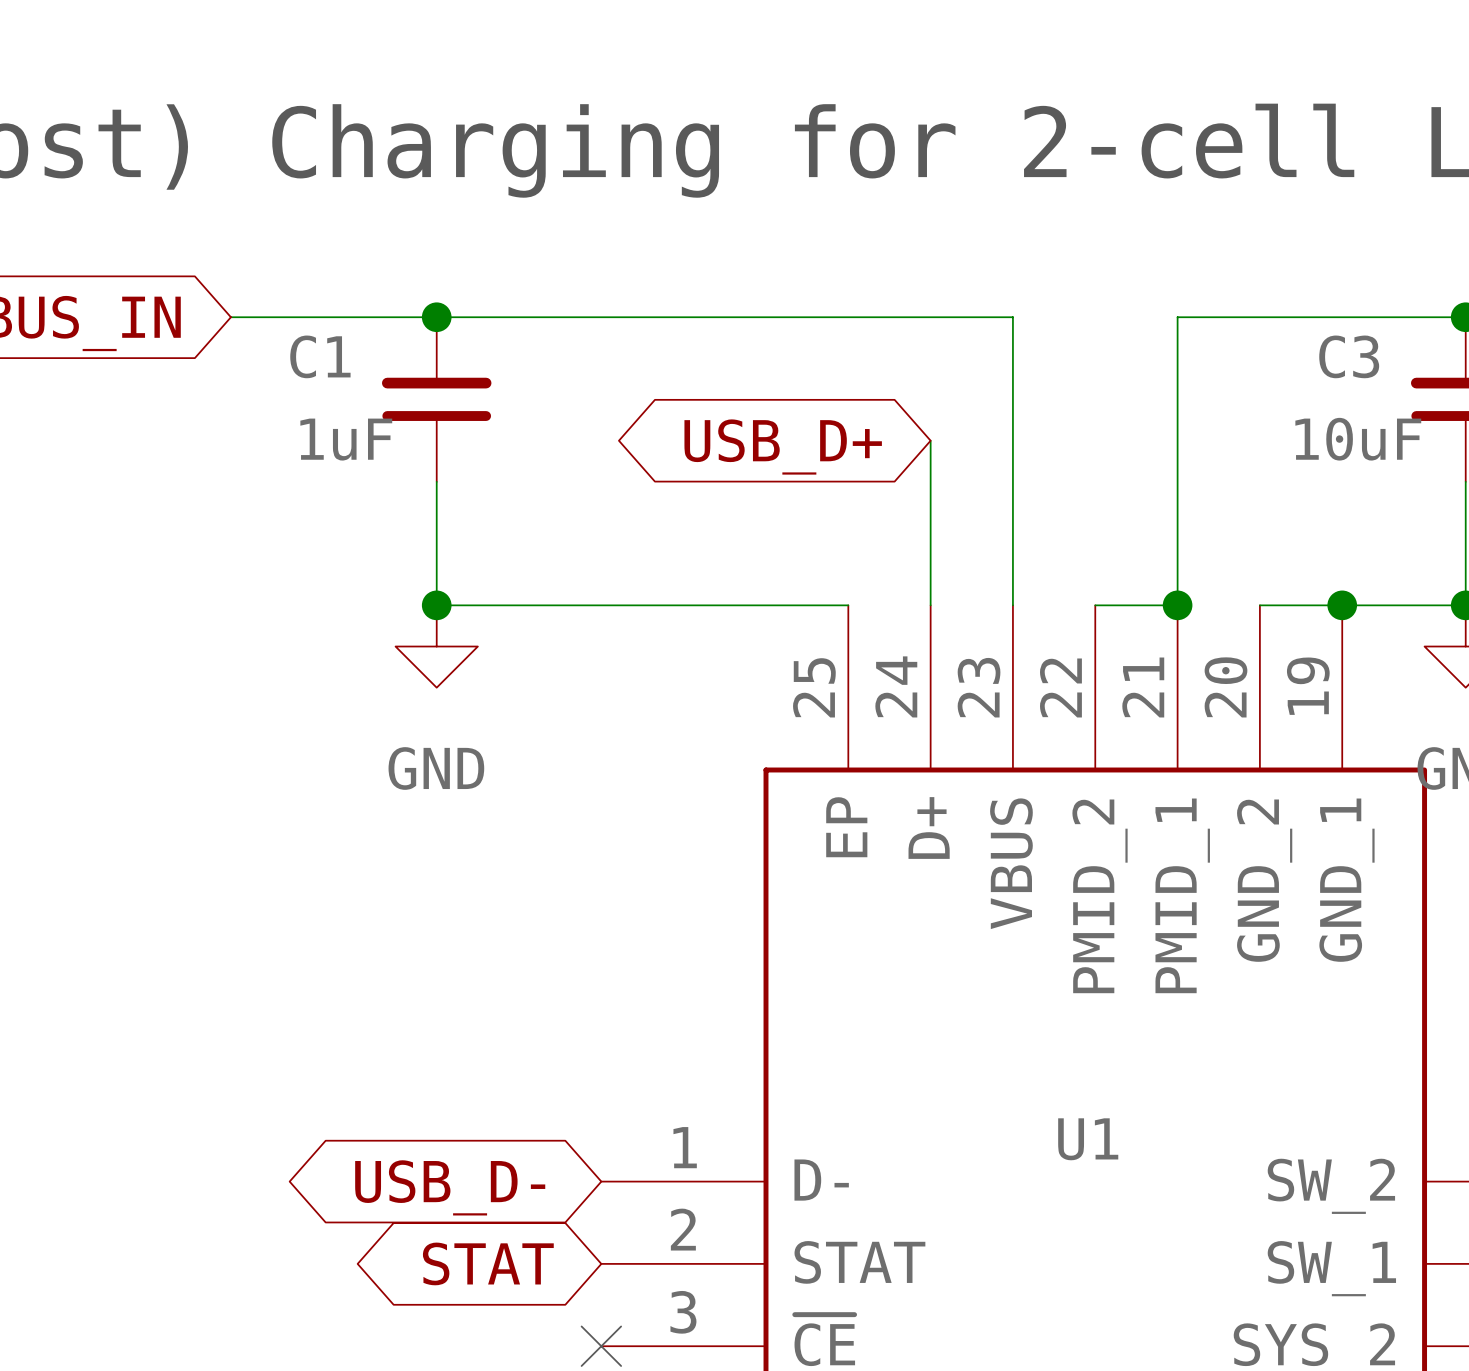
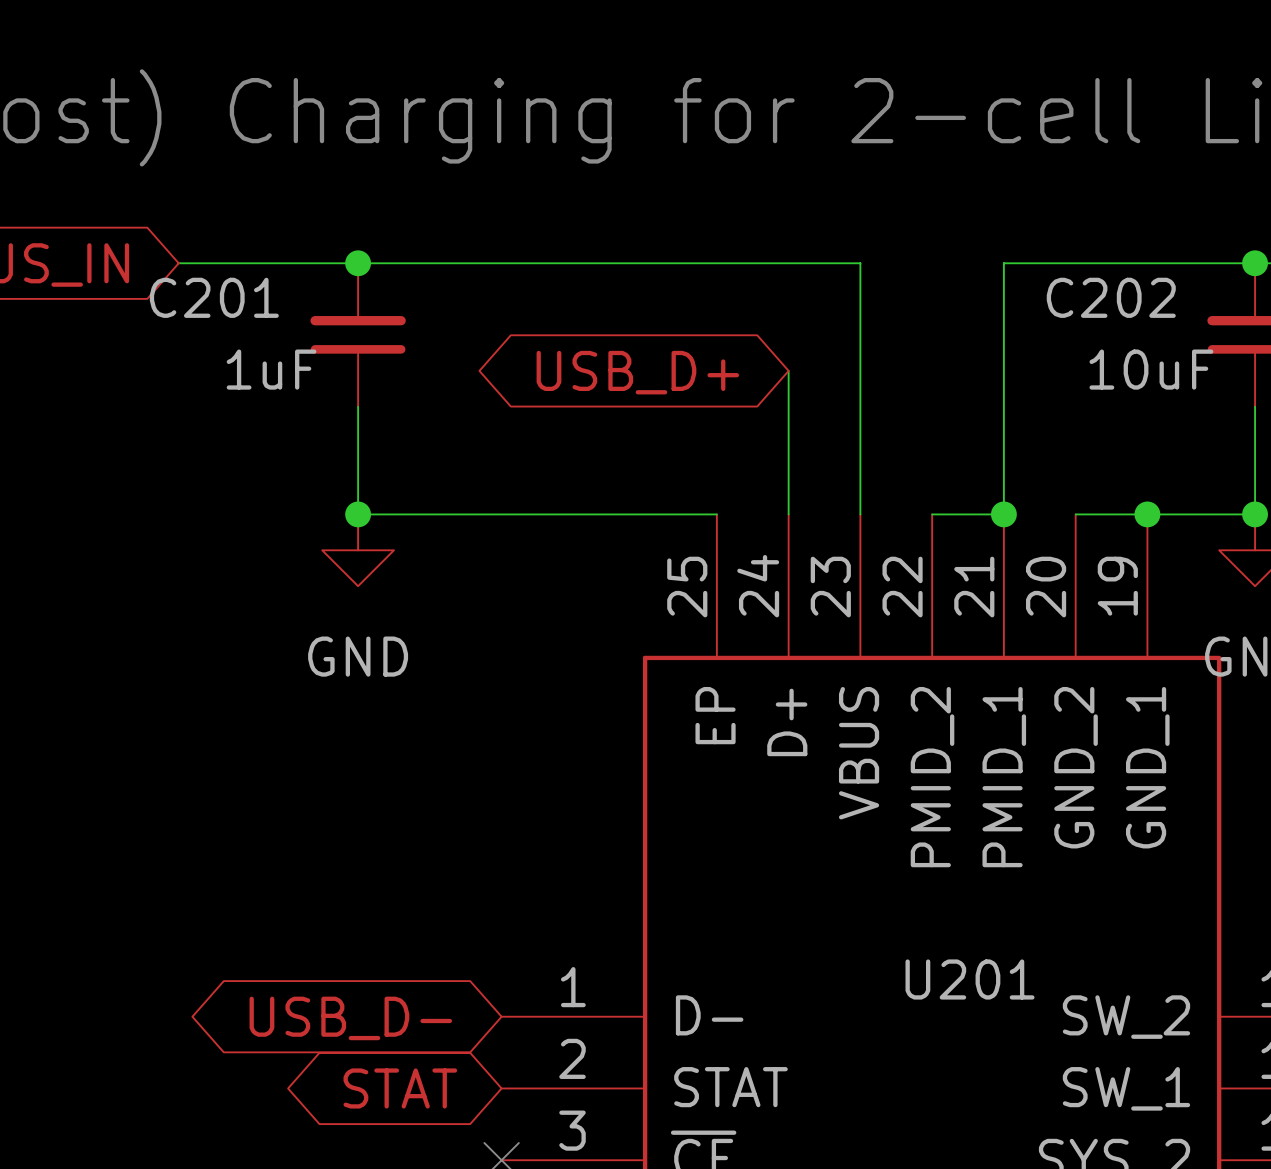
C1 name: C1 (320, 356) -> C201 (214, 297)
C3 name: C3 (1349, 356) -> C202 (1111, 297)
U1 name: U1 (1088, 1139) -> U201 (970, 979)

